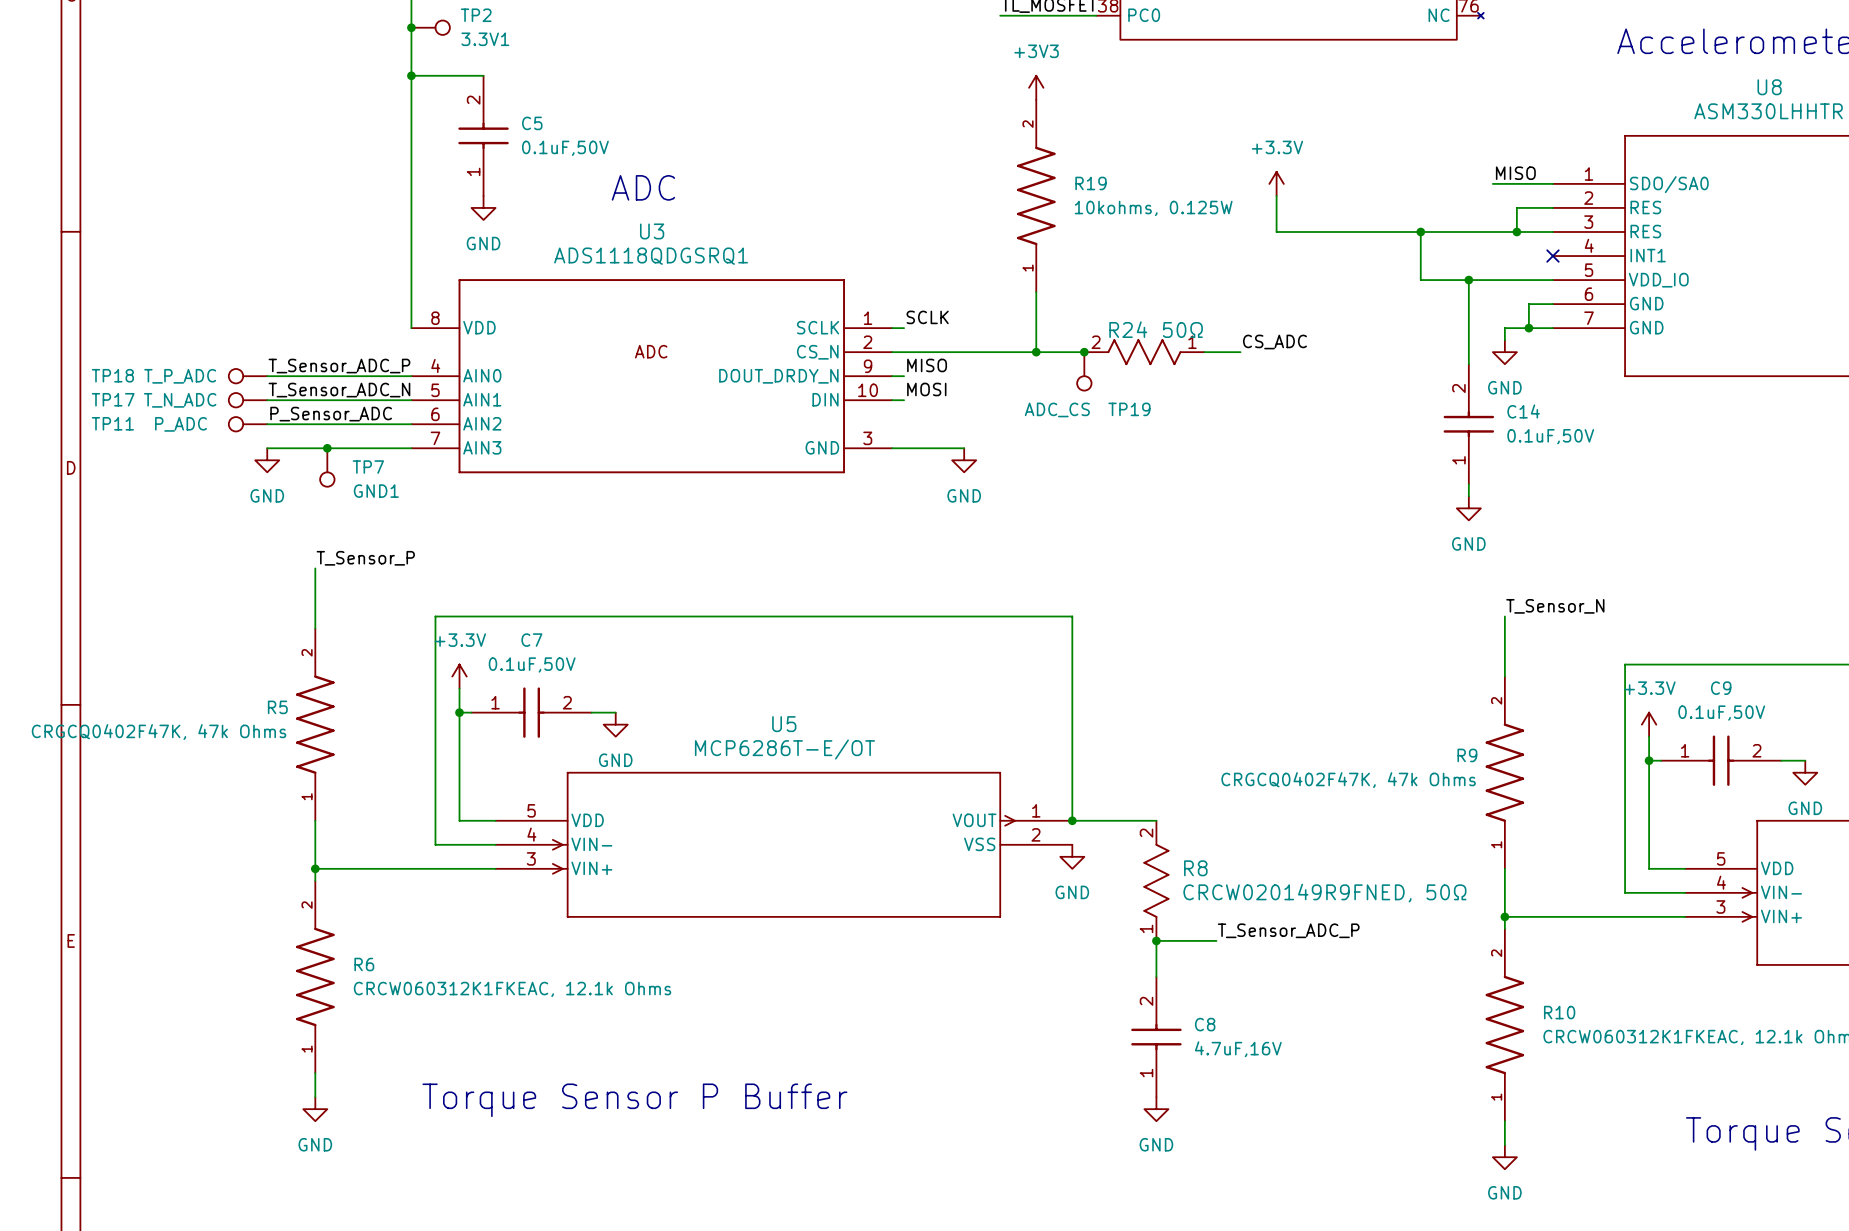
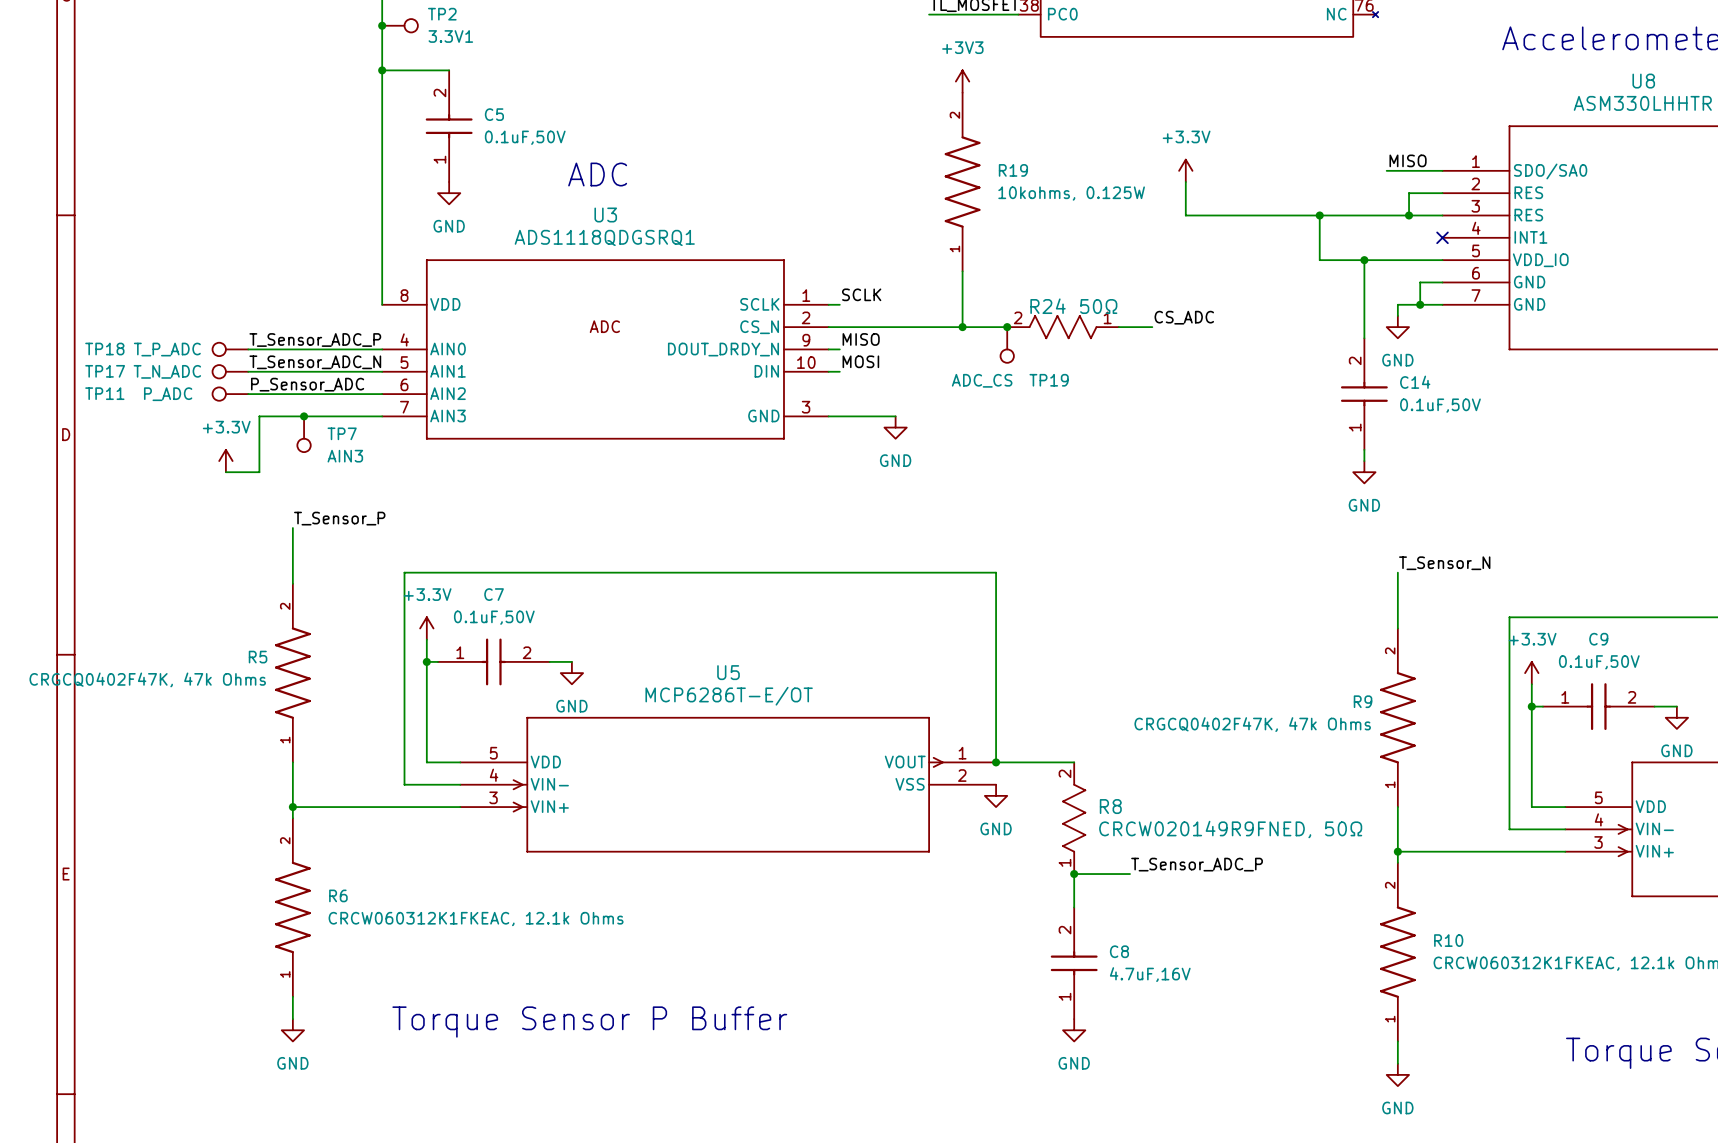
wire: (267, 448) (279, 448) -> (225, 472) (259, 472) (259, 416)
power symbol: GND (267, 460) -> none
TP7 value: GND1 (376, 491) -> AIN3 (345, 456)
power symbol: none -> +3.3V (225, 461)

